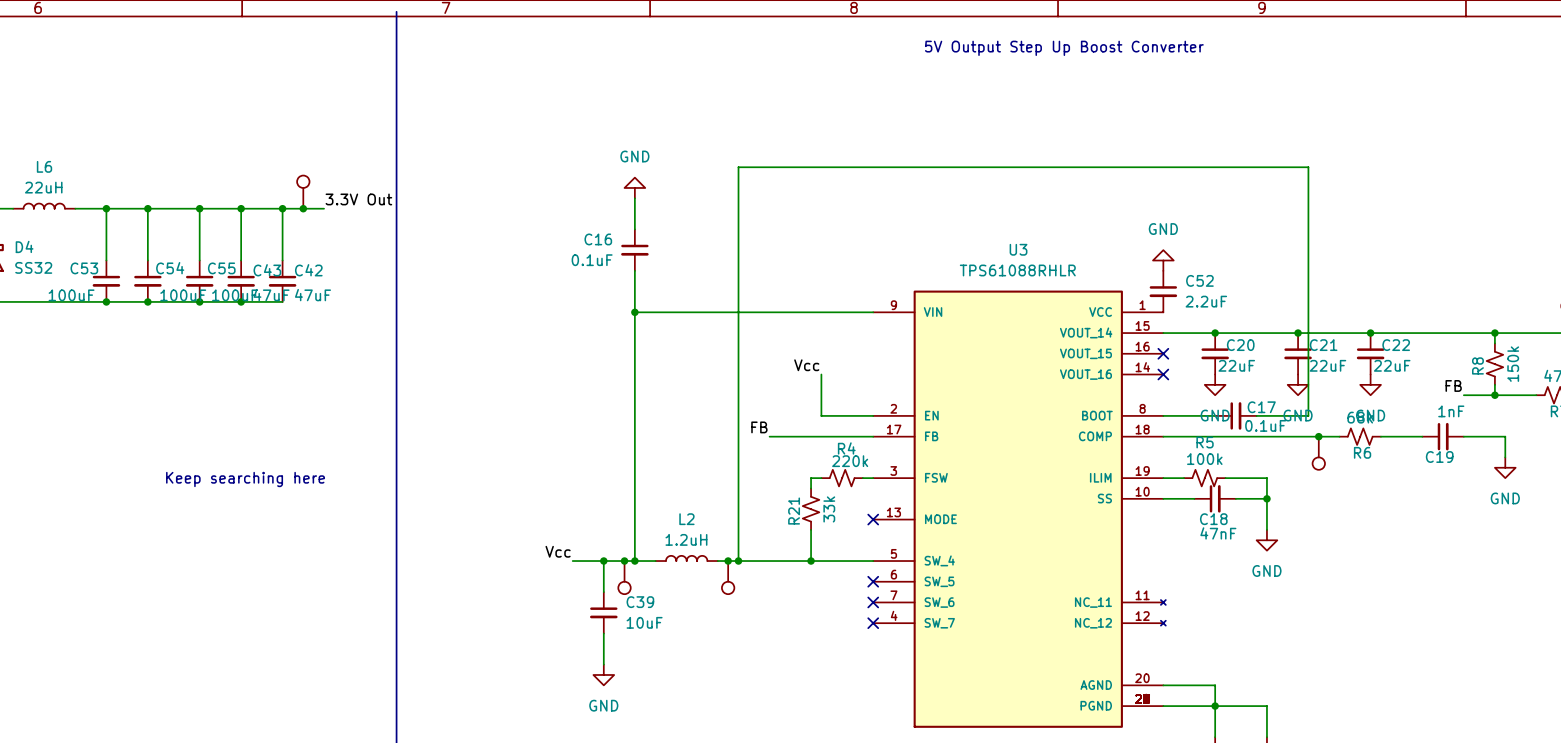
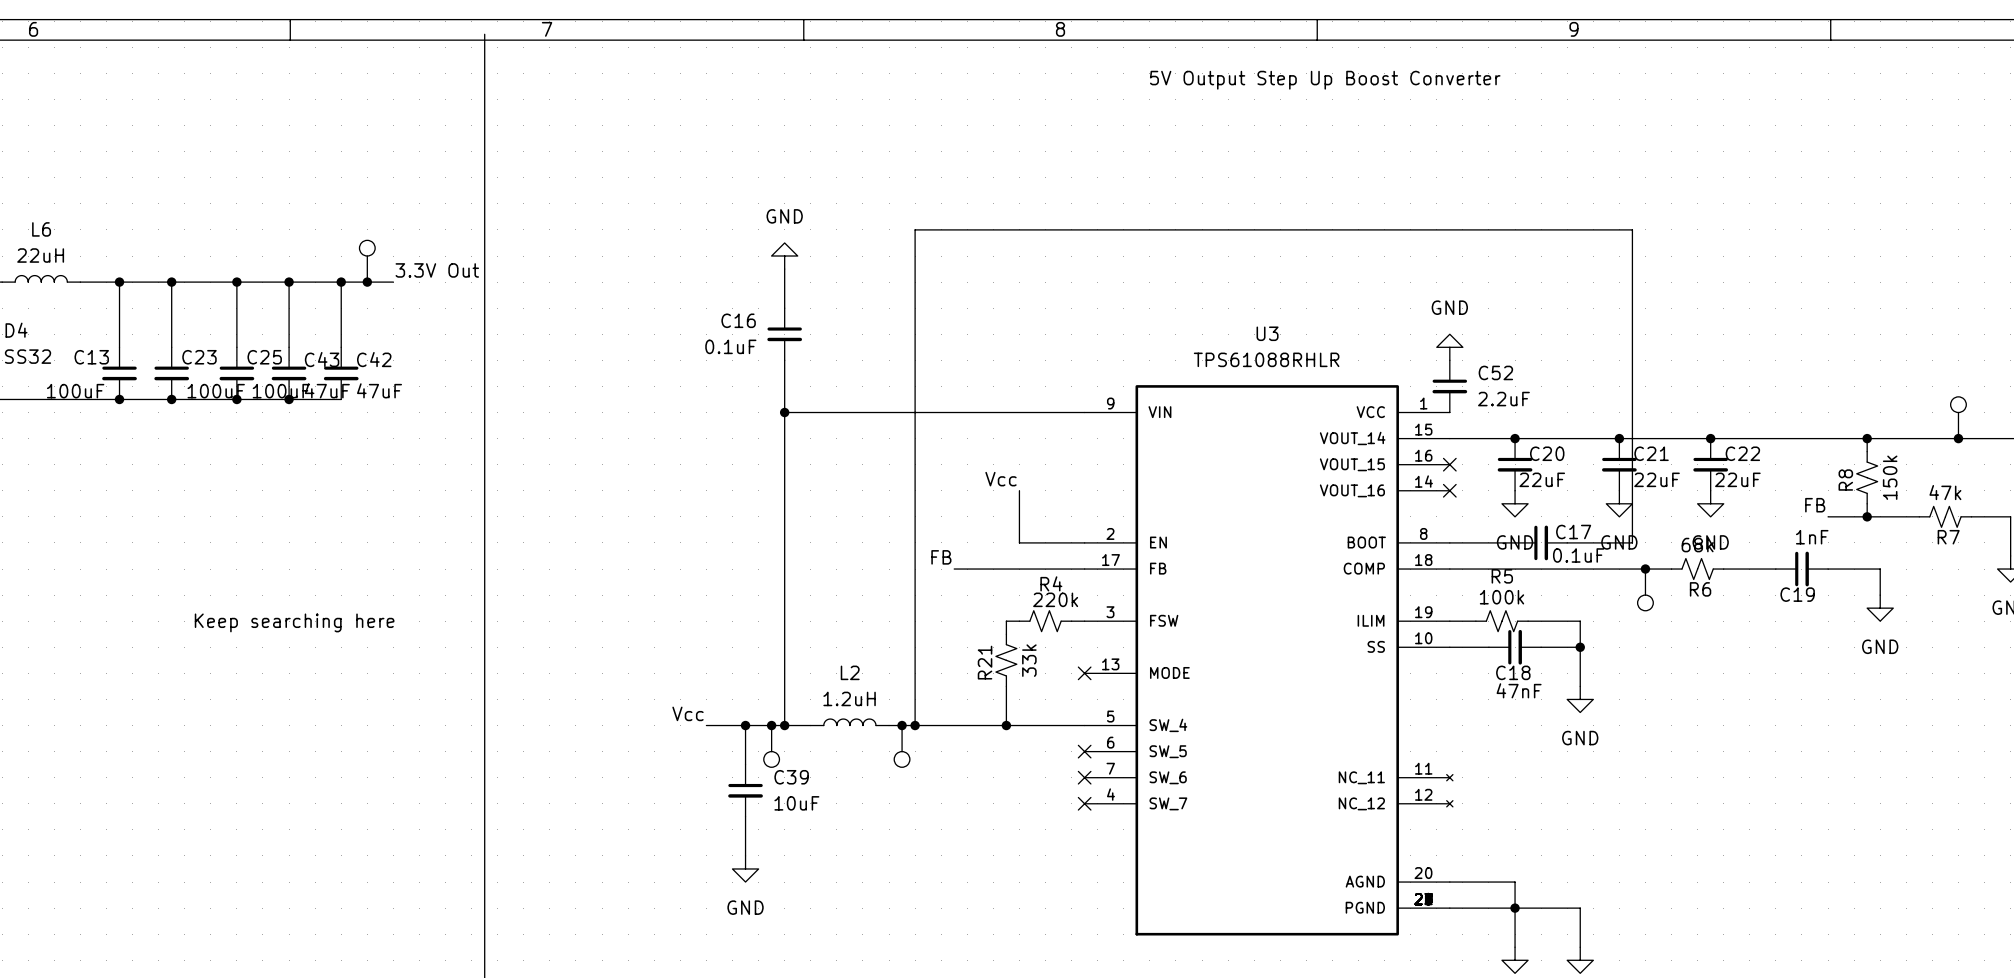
C53 name: C53 (84, 268) -> C13 (91, 357)
C54 name: C54 (170, 268) -> C23 (199, 357)
C55 name: C55 (221, 268) -> C25 (264, 357)

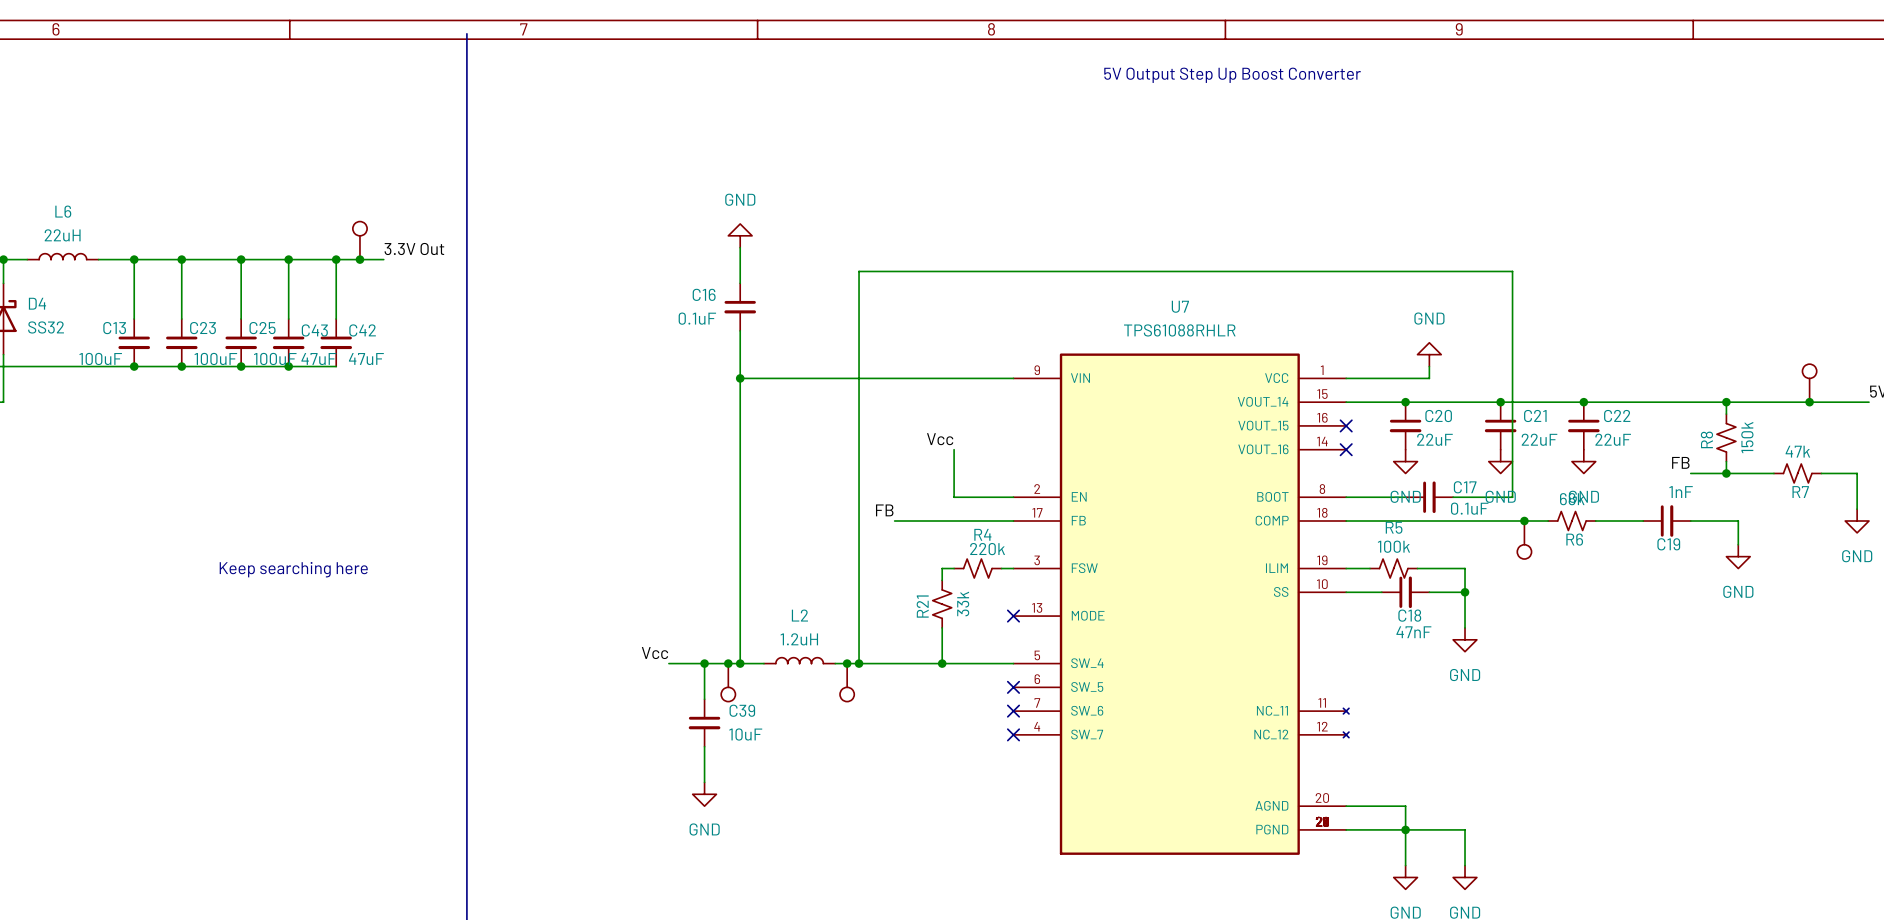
wire: (915, 295) (915, 229) (1632, 229) (1632, 295) -> (859, 271) (1512, 271)
U3 name: U3 (1267, 333) -> U7 (1180, 306)
power symbol position: GND (1449, 347) -> GND (1429, 354)
C52: 2.2uF (1449, 386) -> none
wire: none -> (1429, 366) (1429, 378) (1346, 378)

